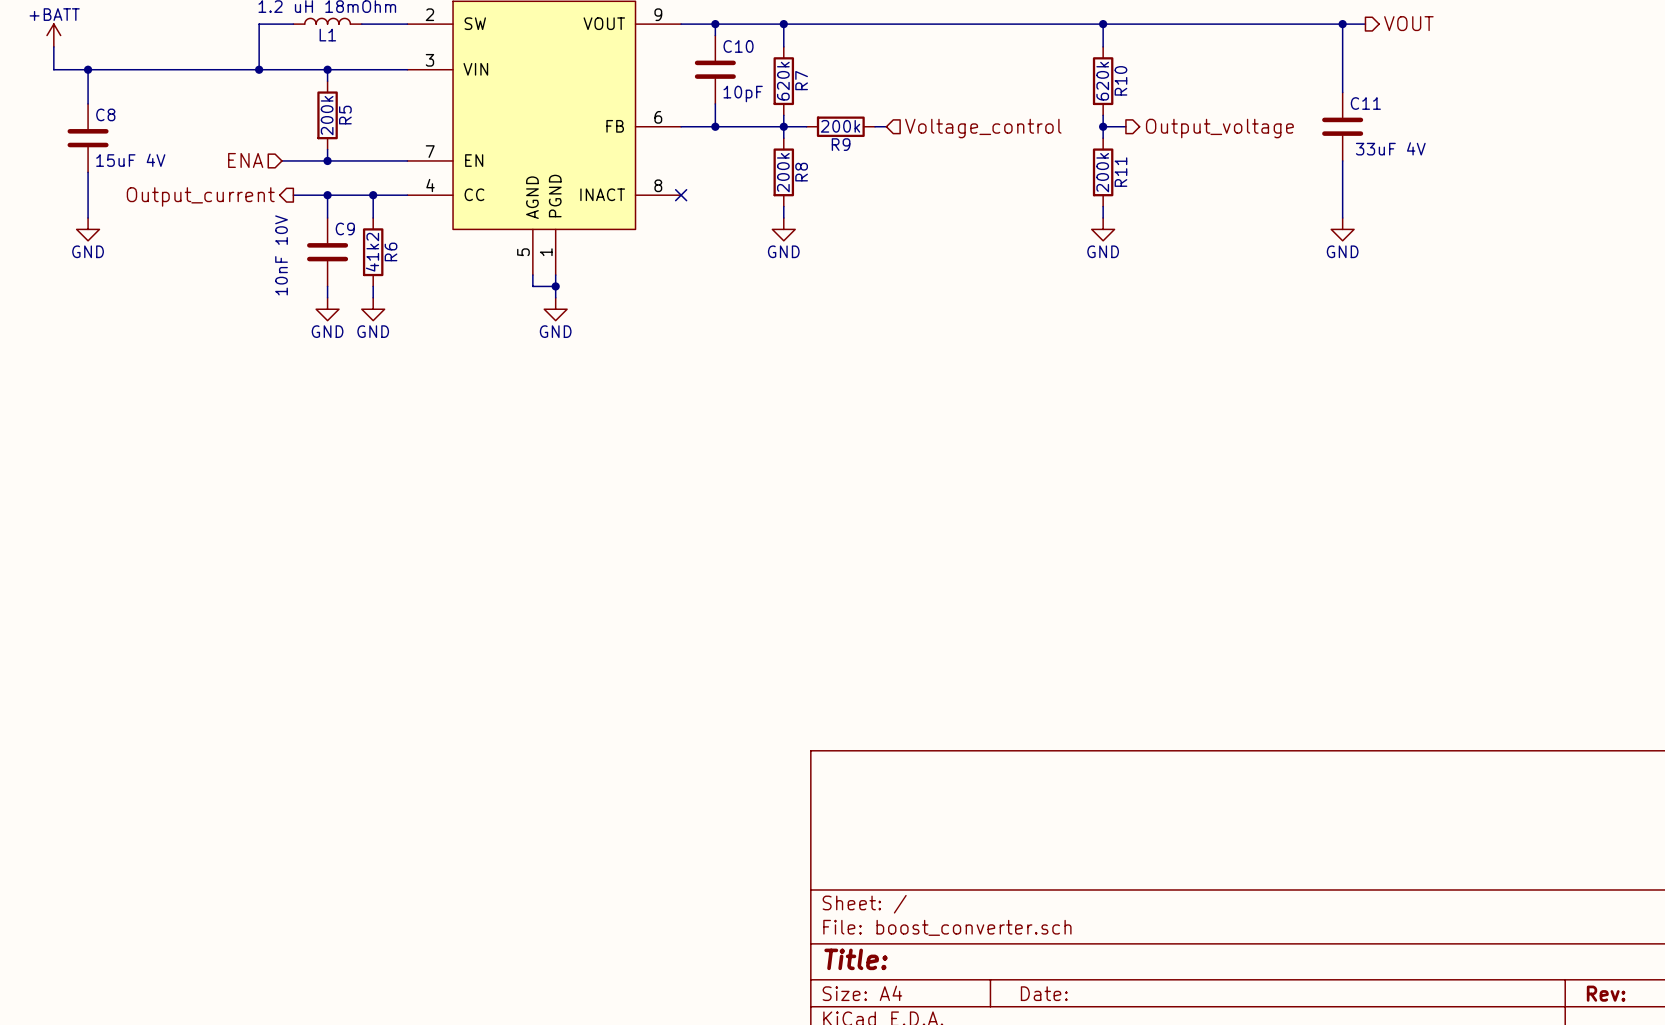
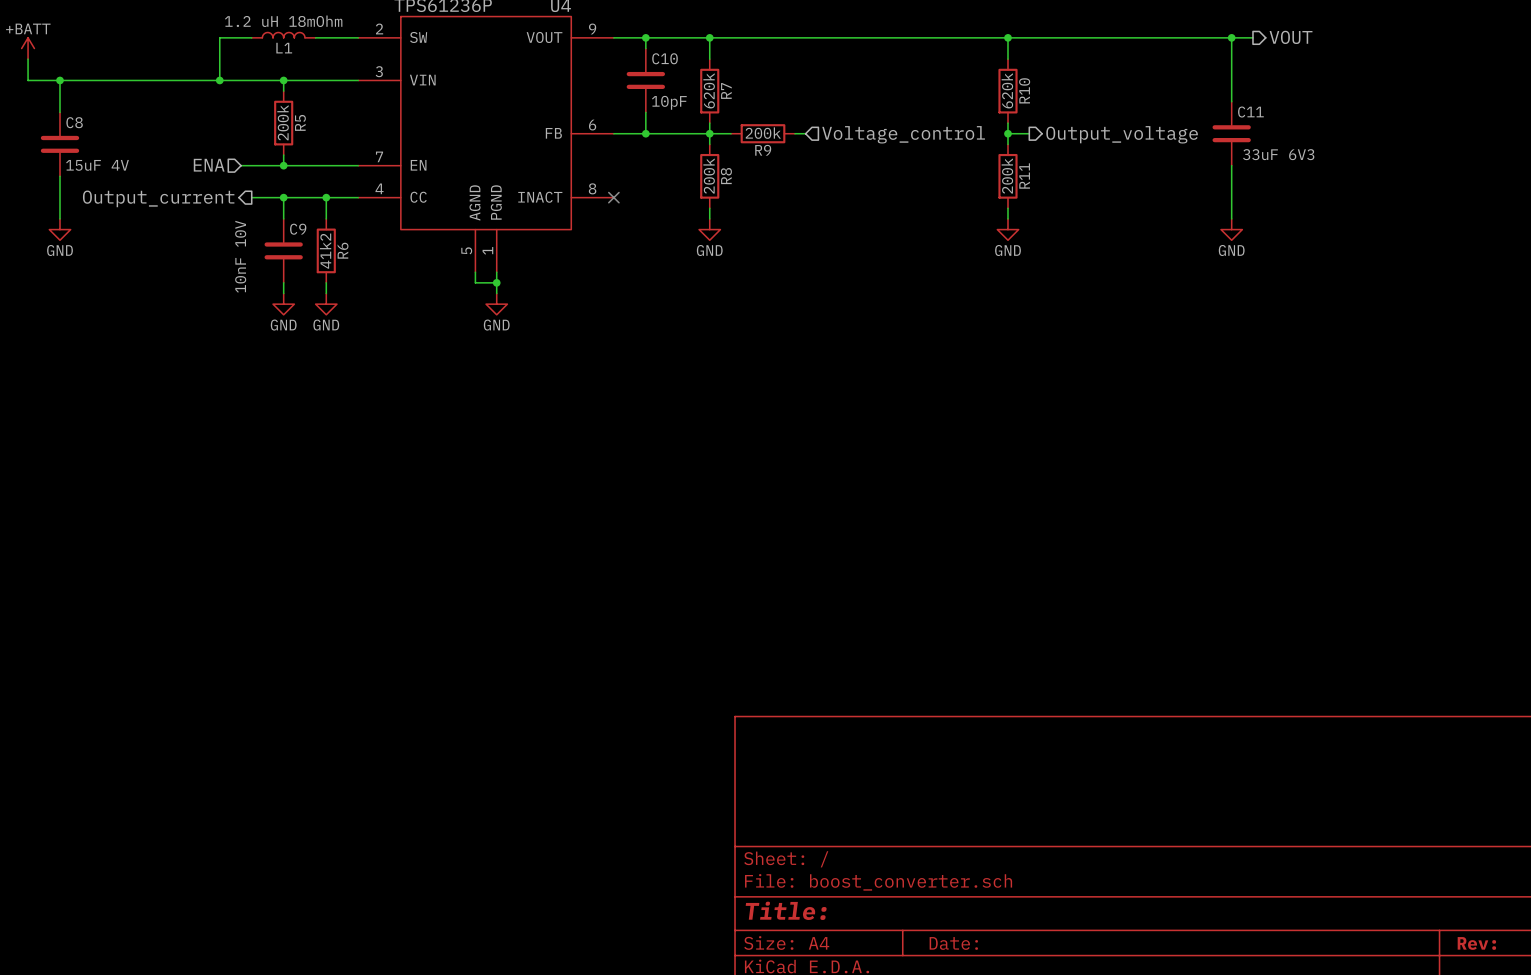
C11 value: 33uF 4V (1390, 148) -> 33uF 6V3 (1278, 154)

